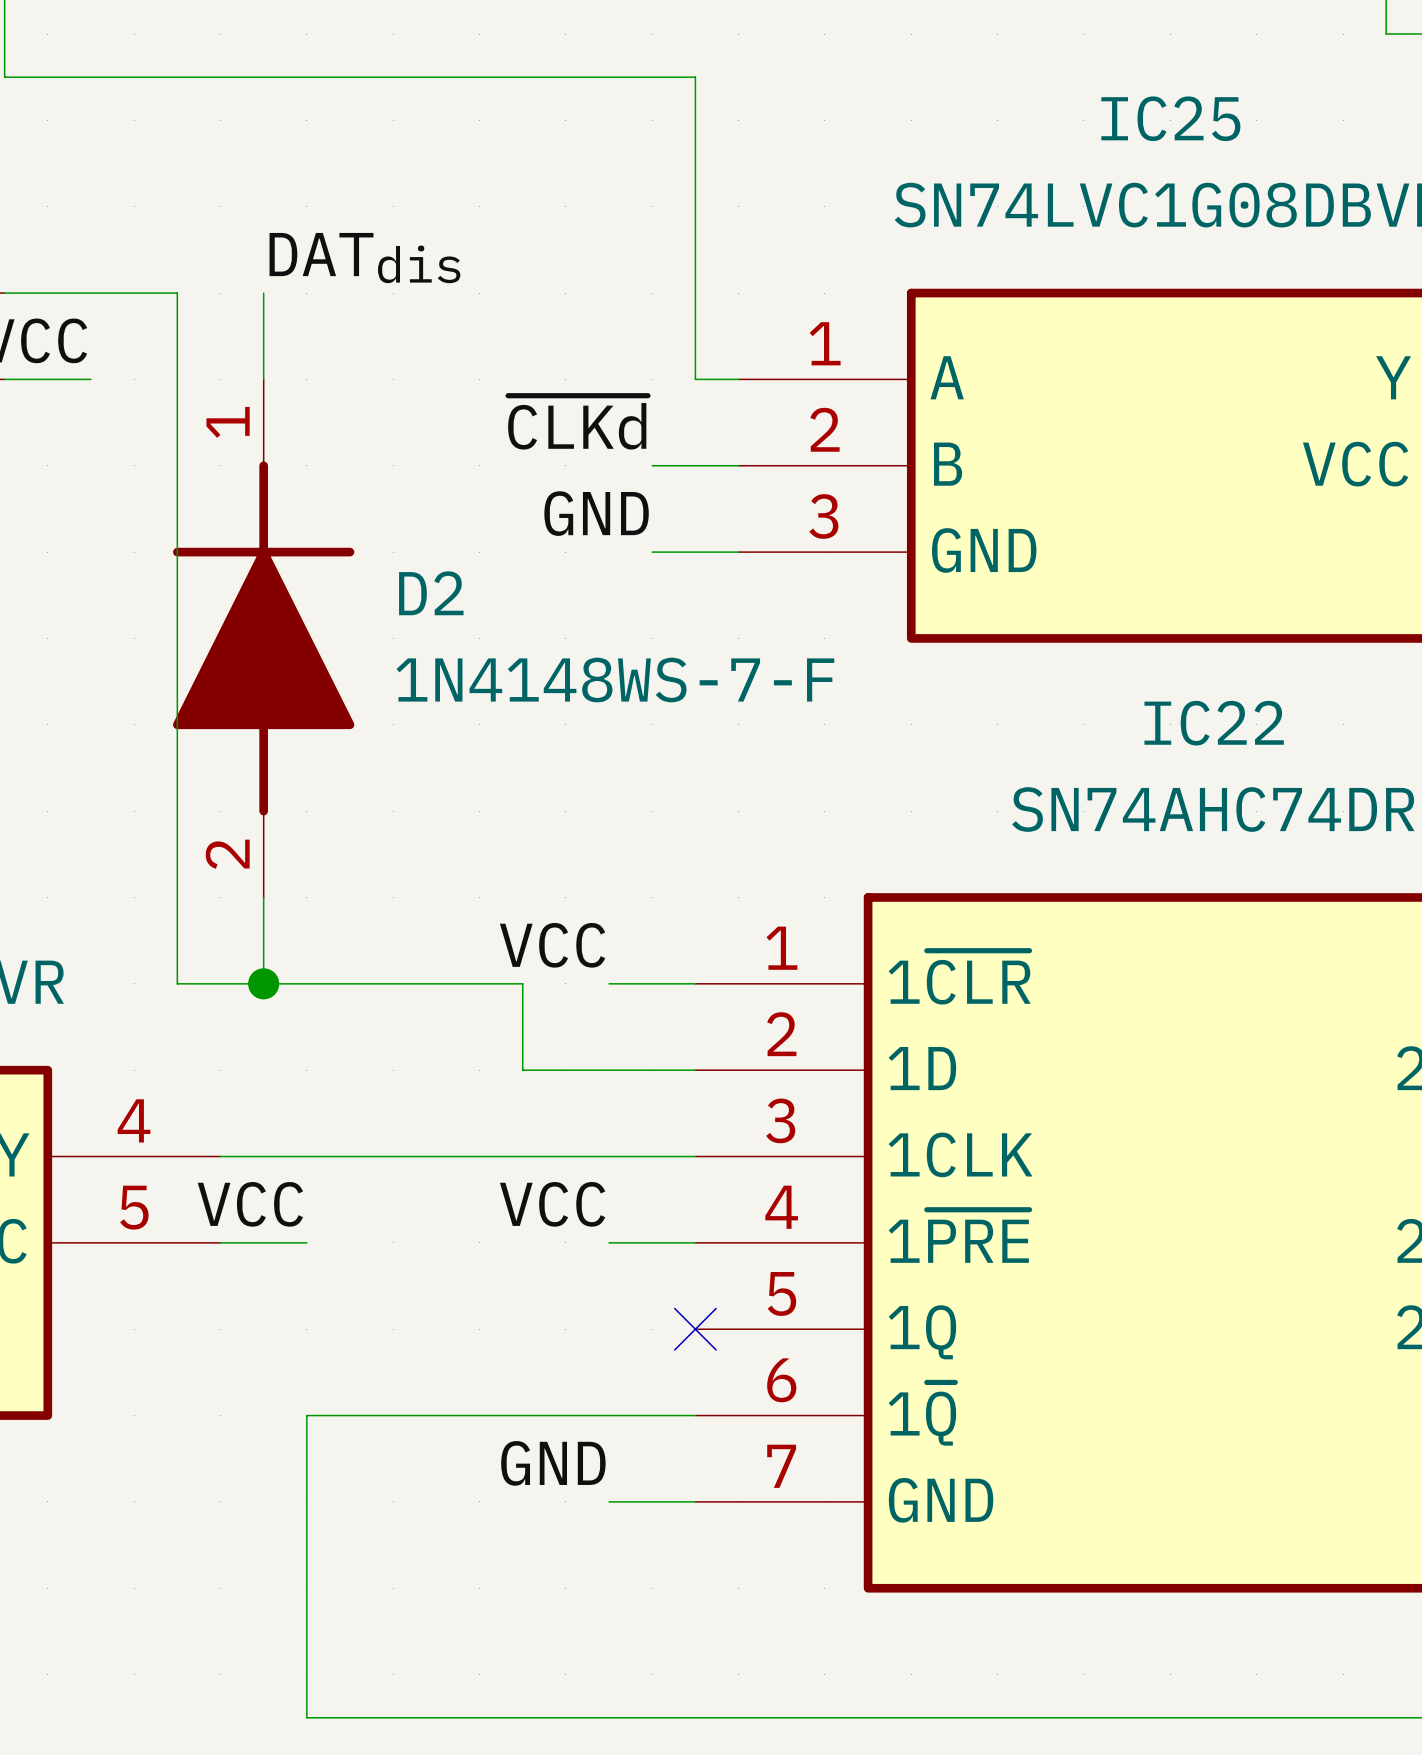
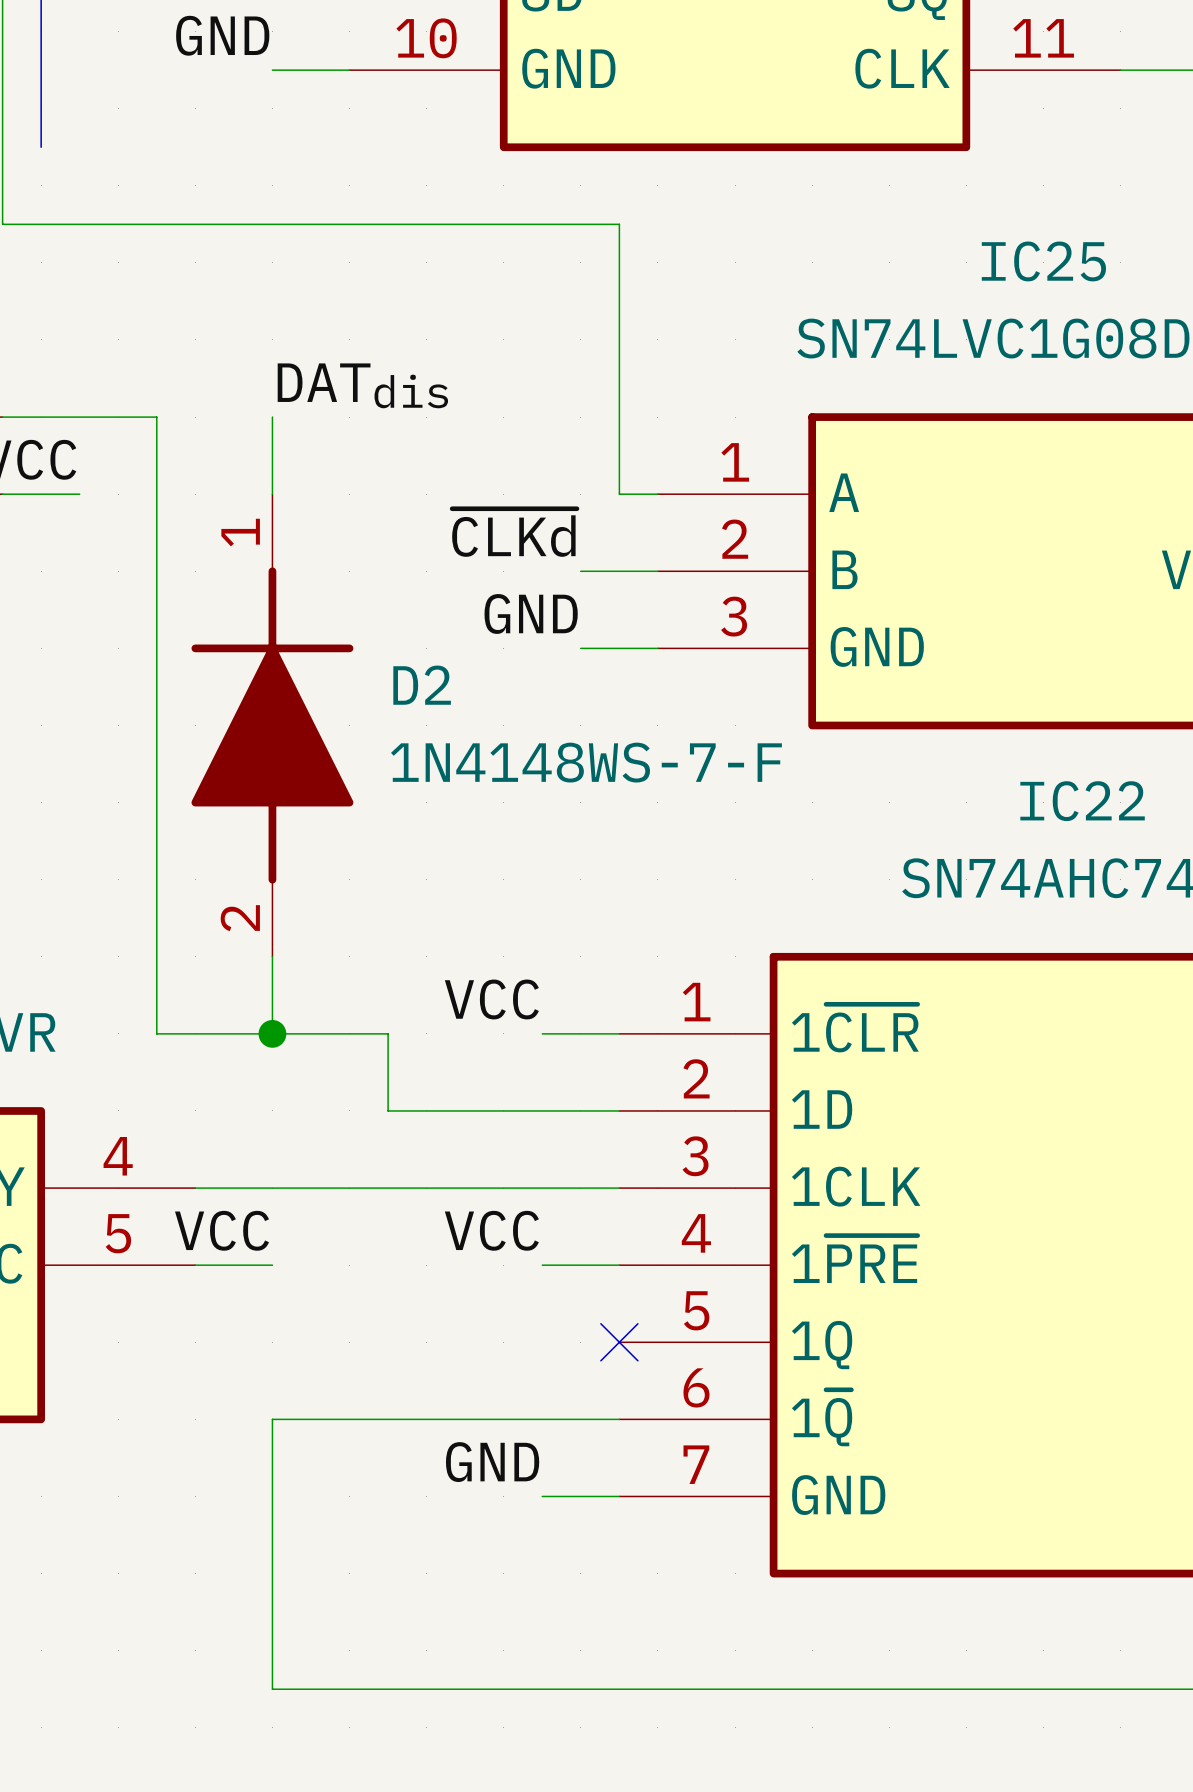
label position: DATdis (364, 258) -> DATdis (362, 385)
wire: (263, 293) (263, 379) -> (272, 417) (272, 494)
D2 position: (263, 638) -> (272, 725)
wire: (263, 897) (263, 983) -> (272, 956) (272, 1033)
junction position: (263, 983) -> (272, 1033)
wire: (436, 983) (522, 983) (522, 1070) -> (388, 1033) (388, 1110) (465, 1110)

